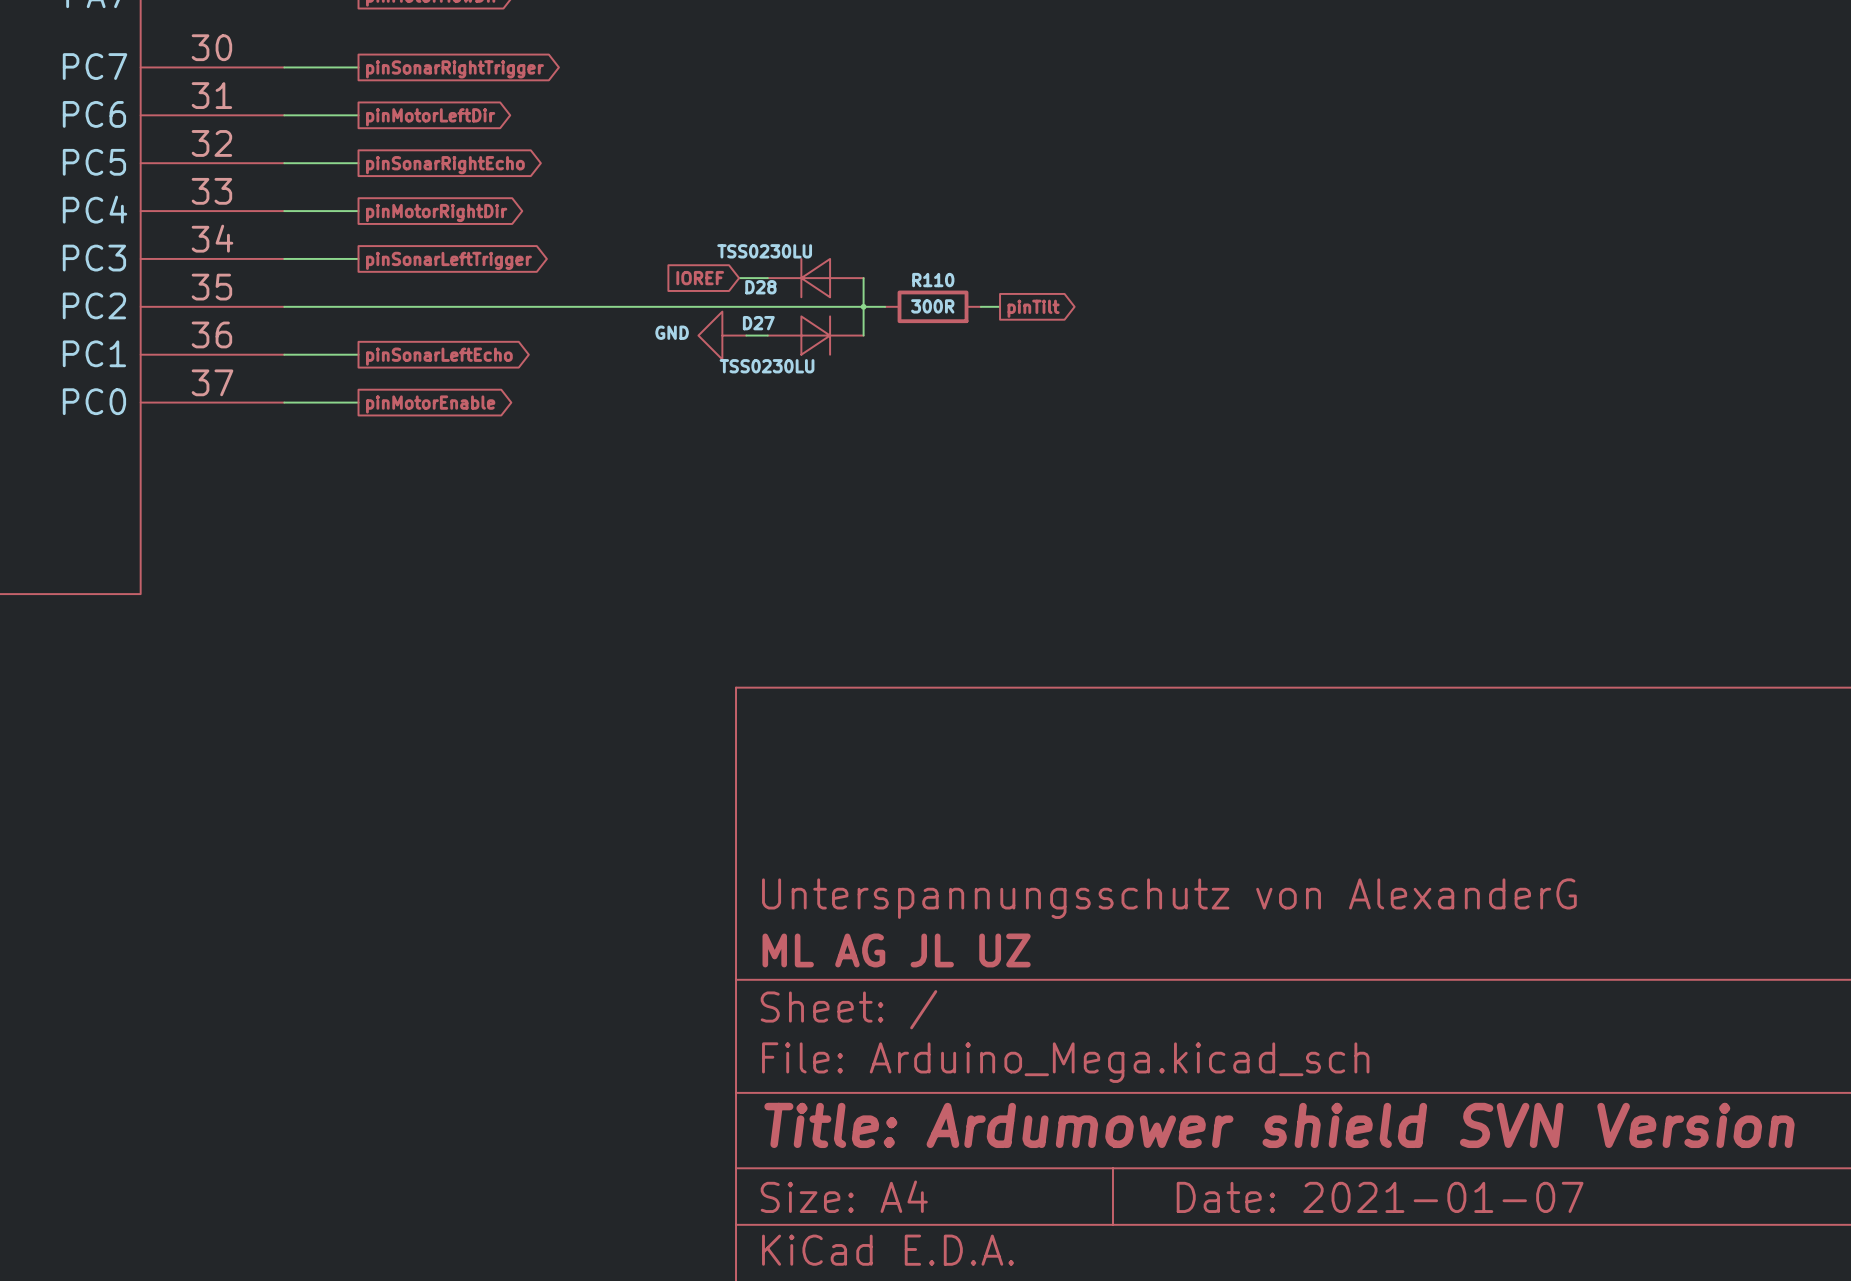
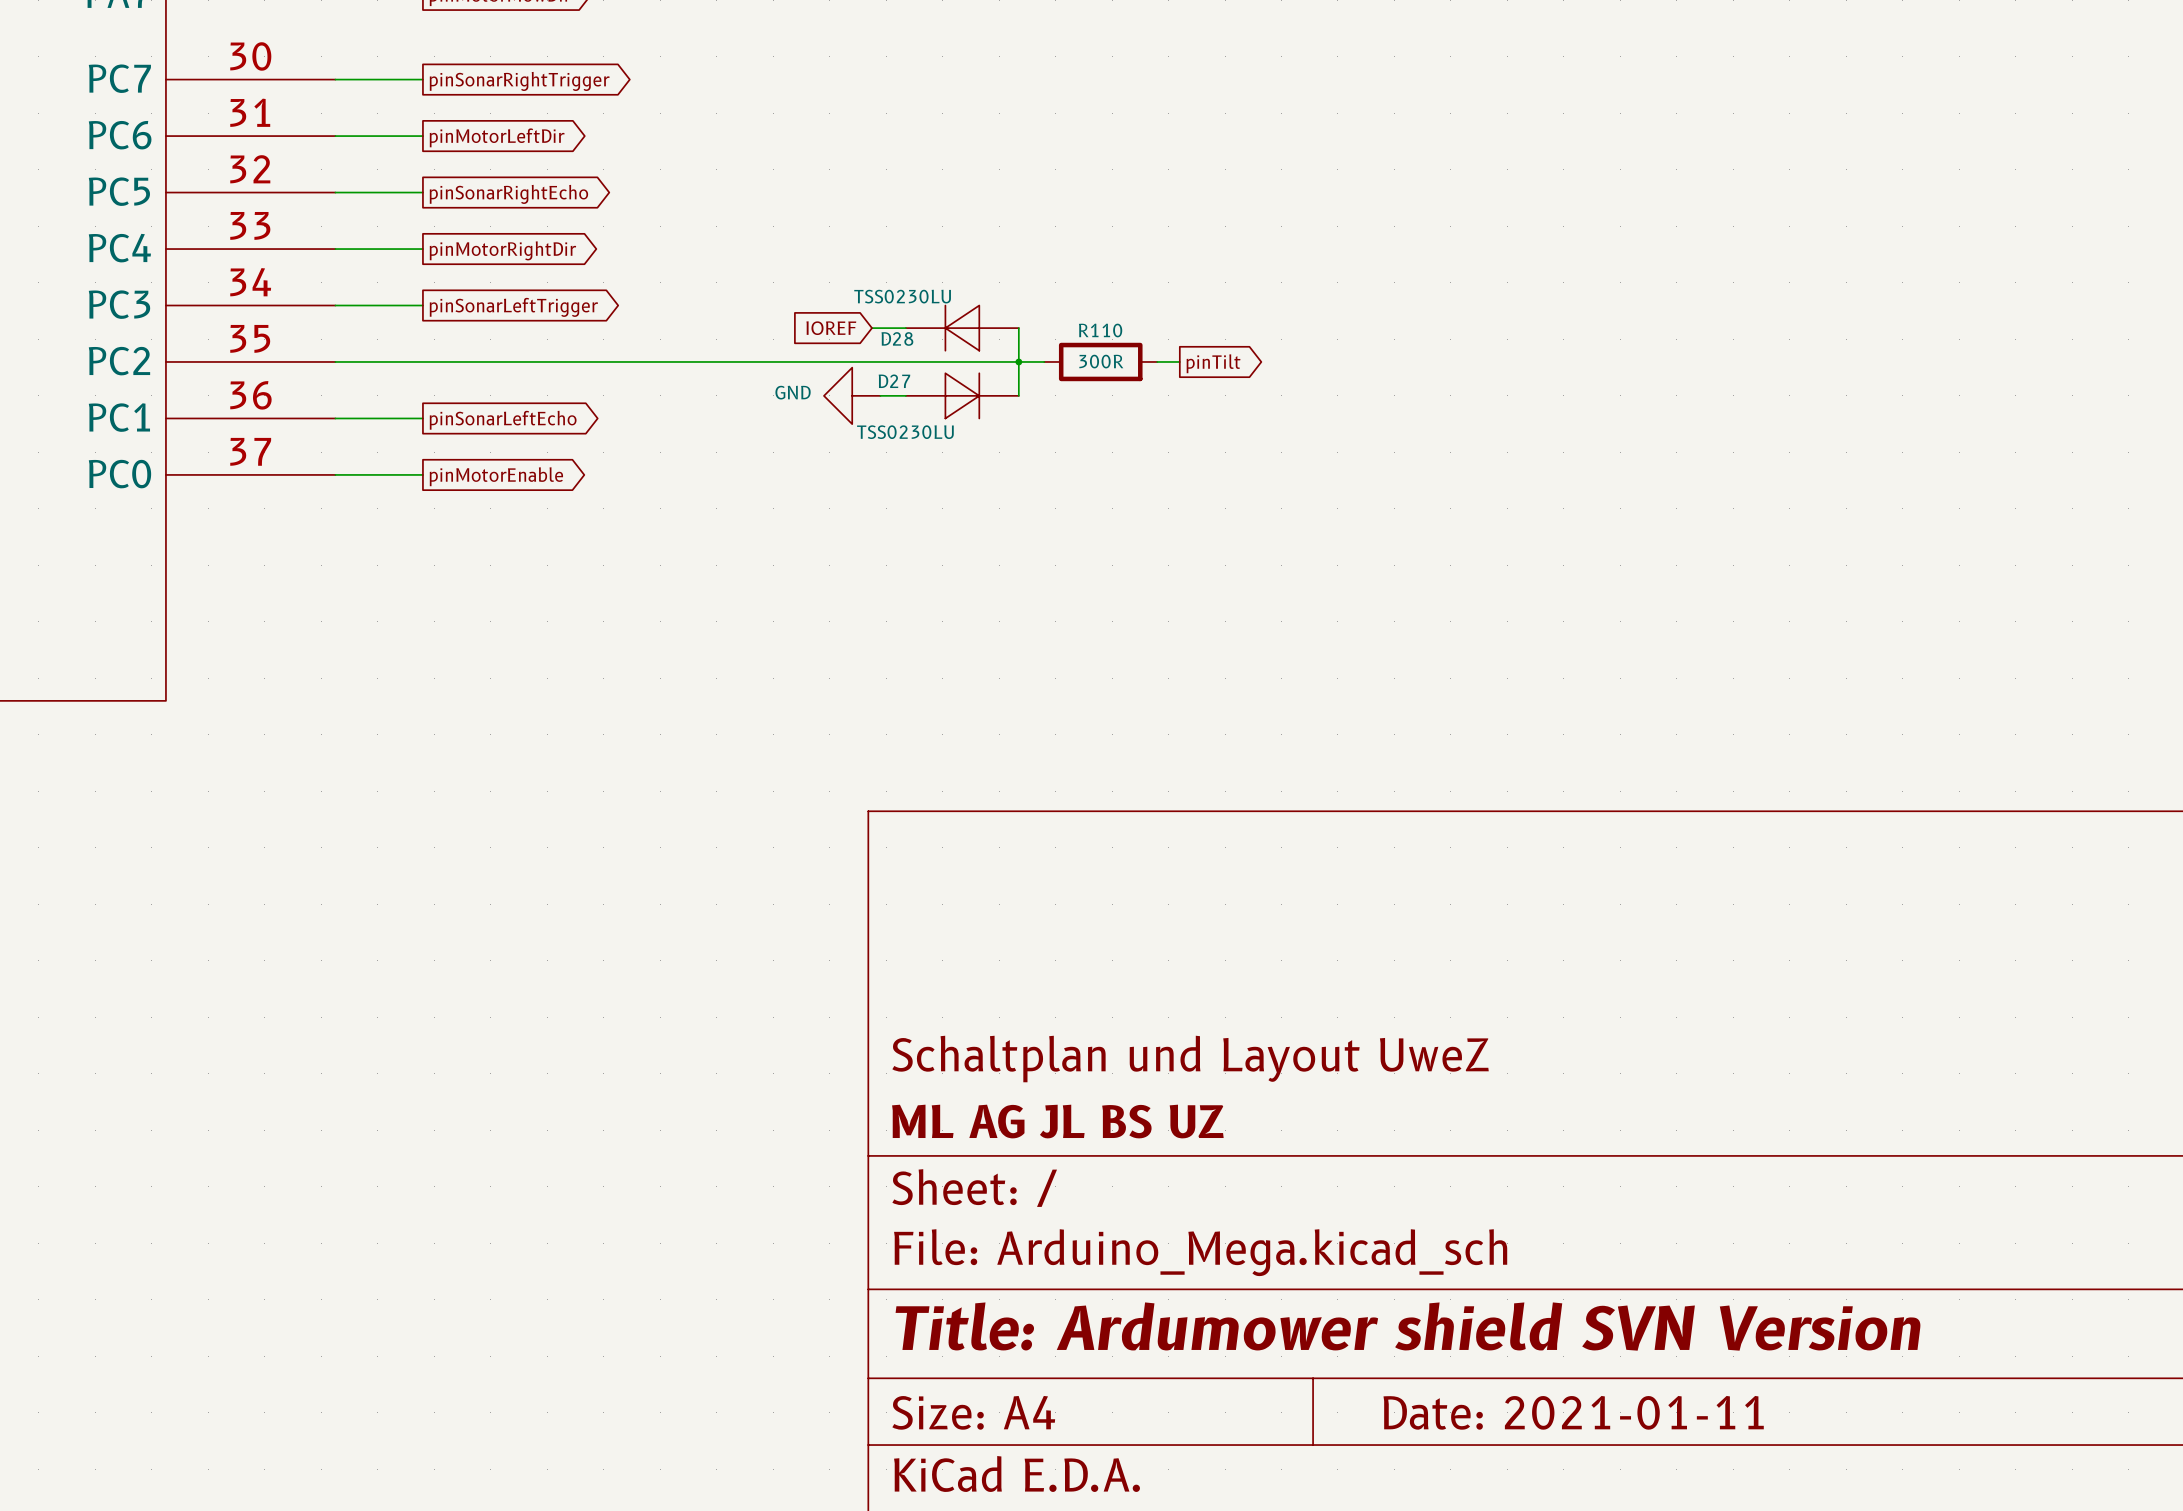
title block: Unterspannungsschutz von AlexanderG (1169, 898) -> Schaltplan und Layout UweZ (1190, 1059)
title block: ML AG JL UZ (896, 950) -> ML AG JL BS UZ (1057, 1121)
title block: Date: 2021-01-07 (1380, 1197) -> Date: 2021-01-11 (1573, 1412)

